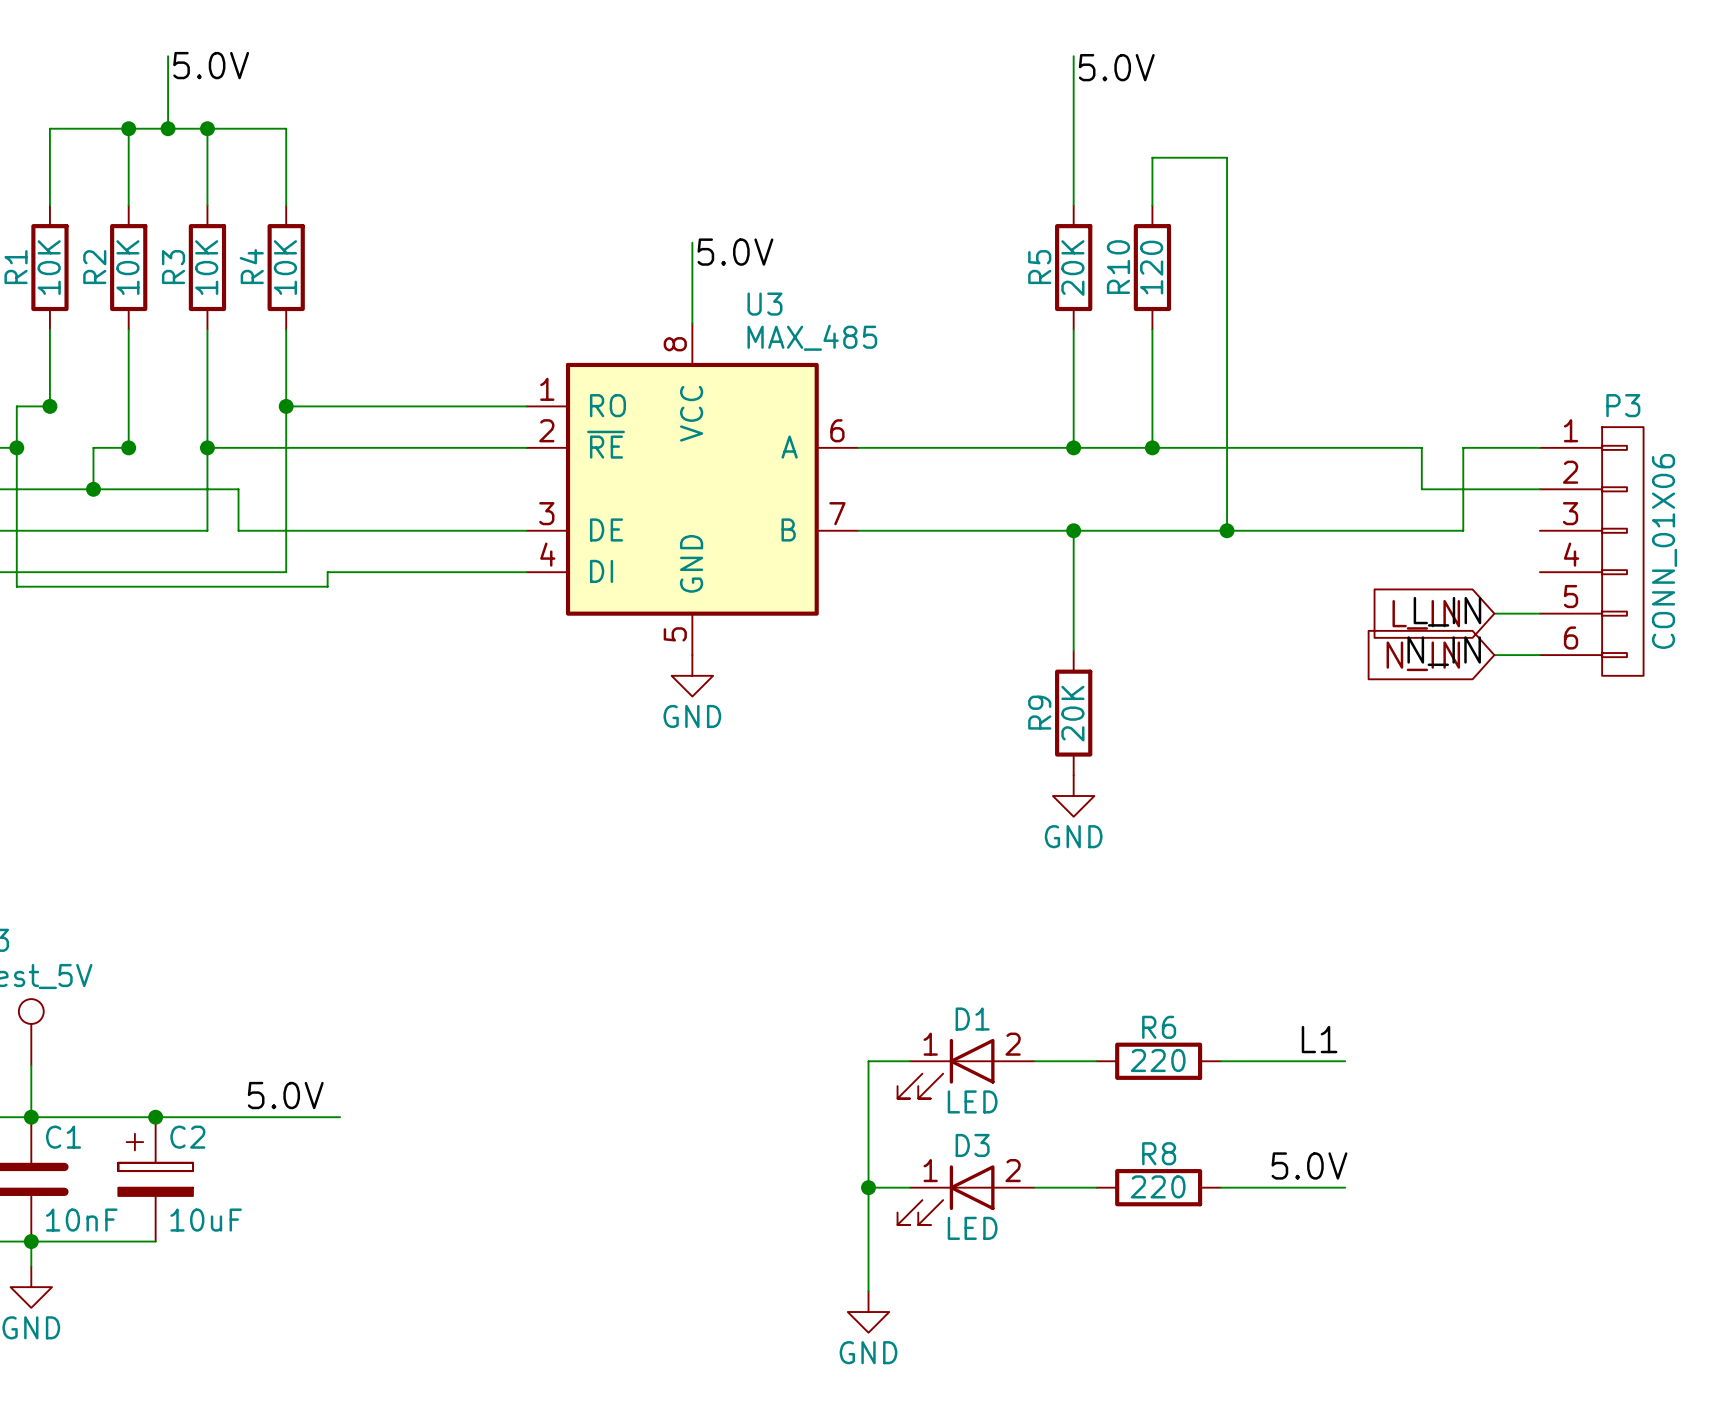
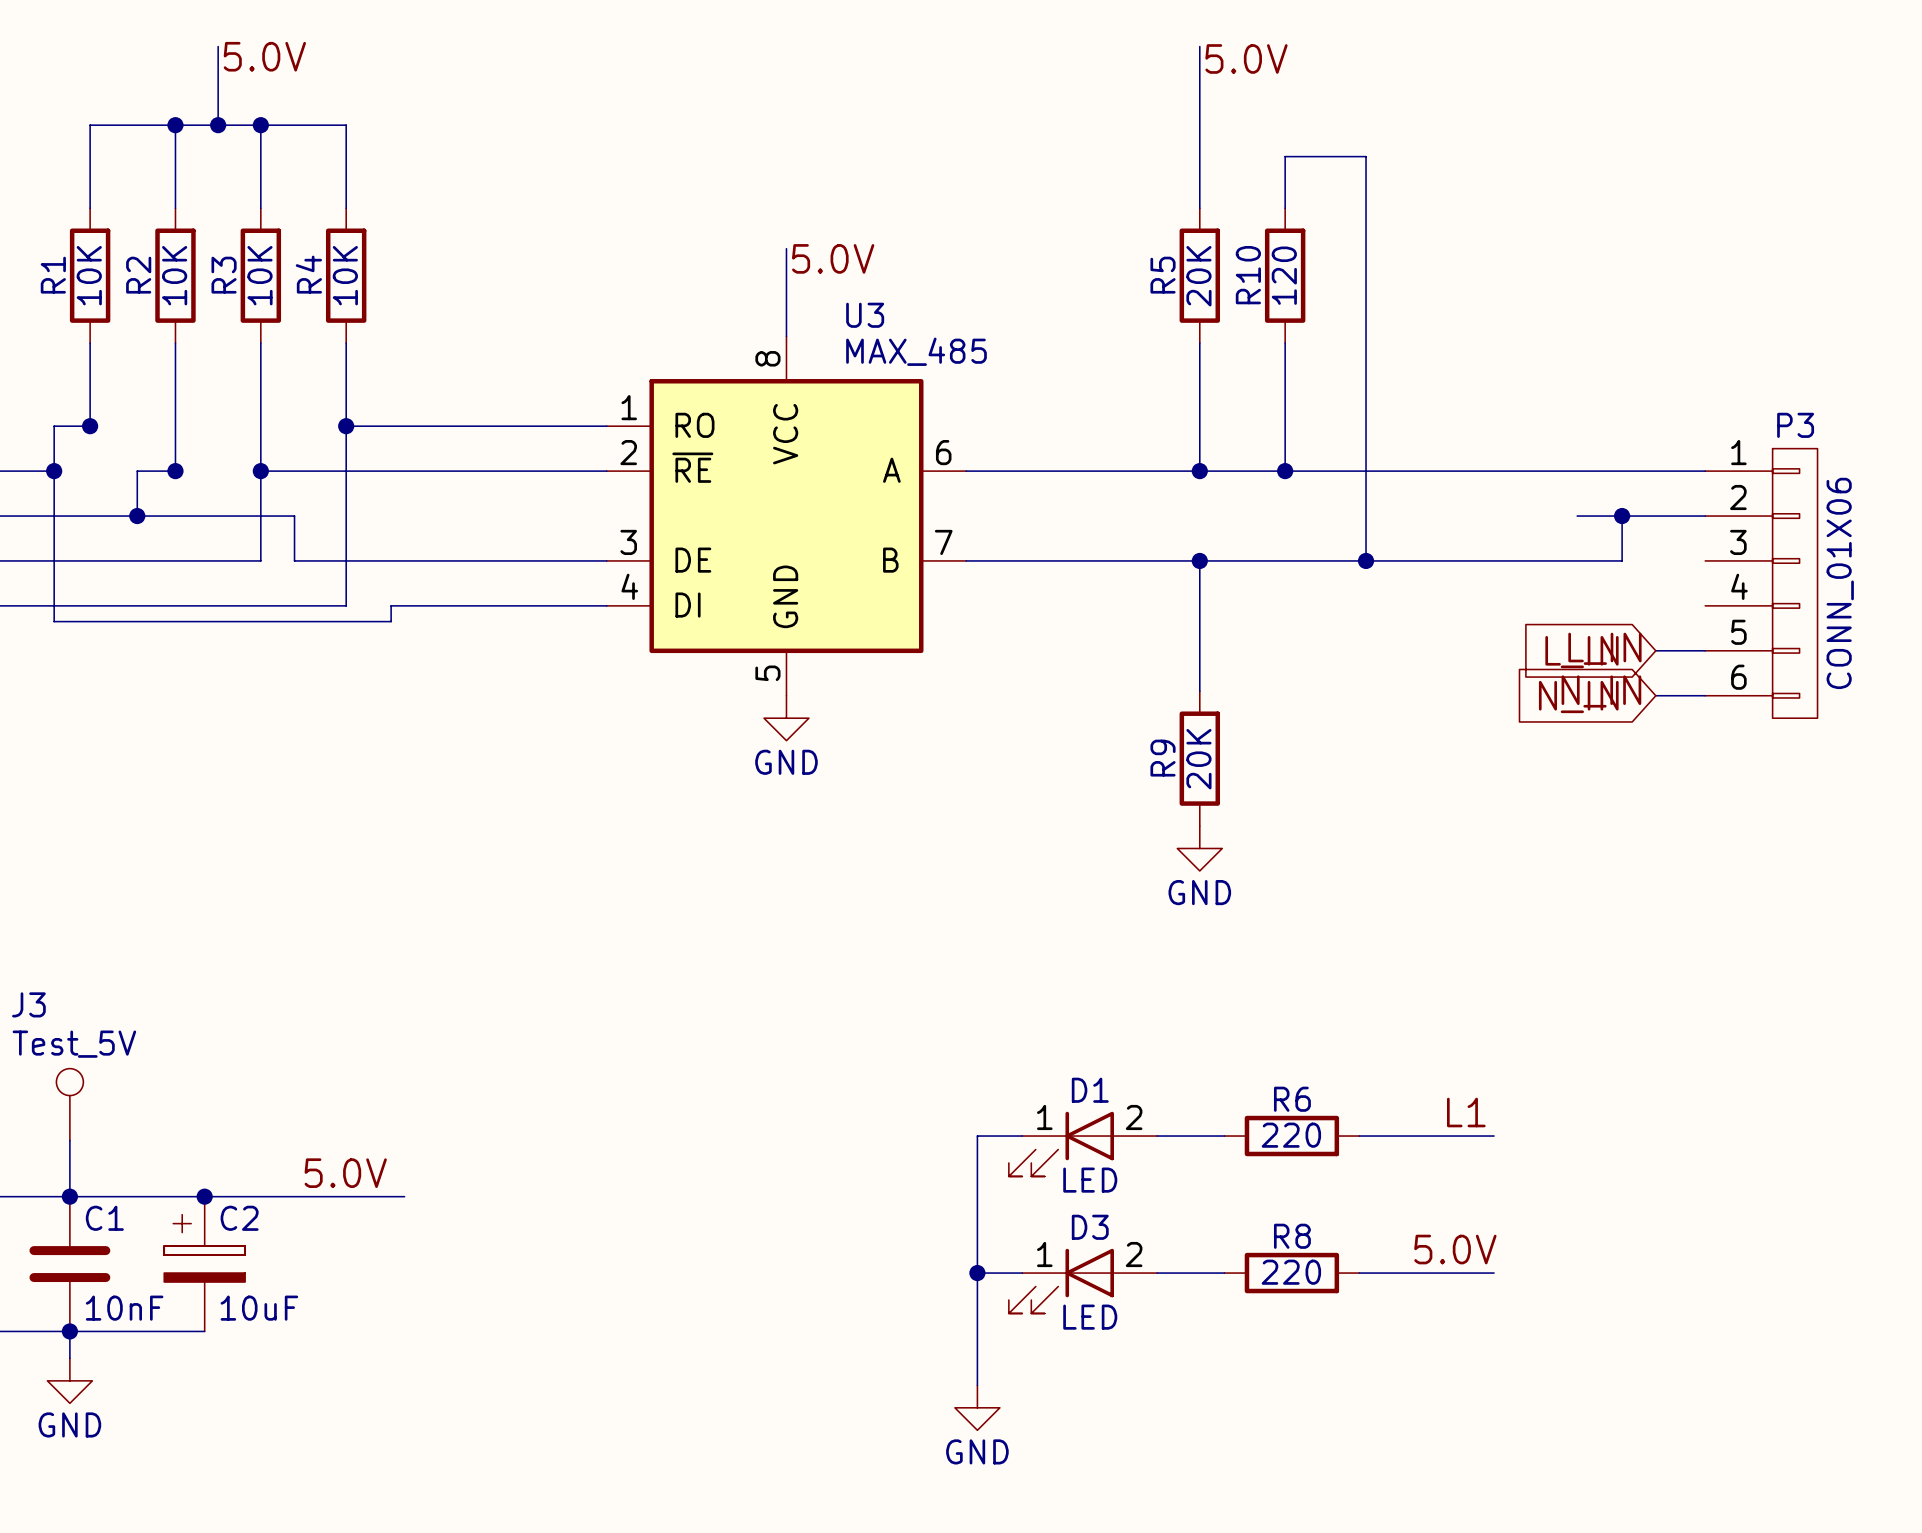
wire: (1421, 447) (1421, 489) -> (1577, 471) (1622, 471)
wire: (1463, 447) (1463, 489) -> none
junction: none -> (1622, 516)

